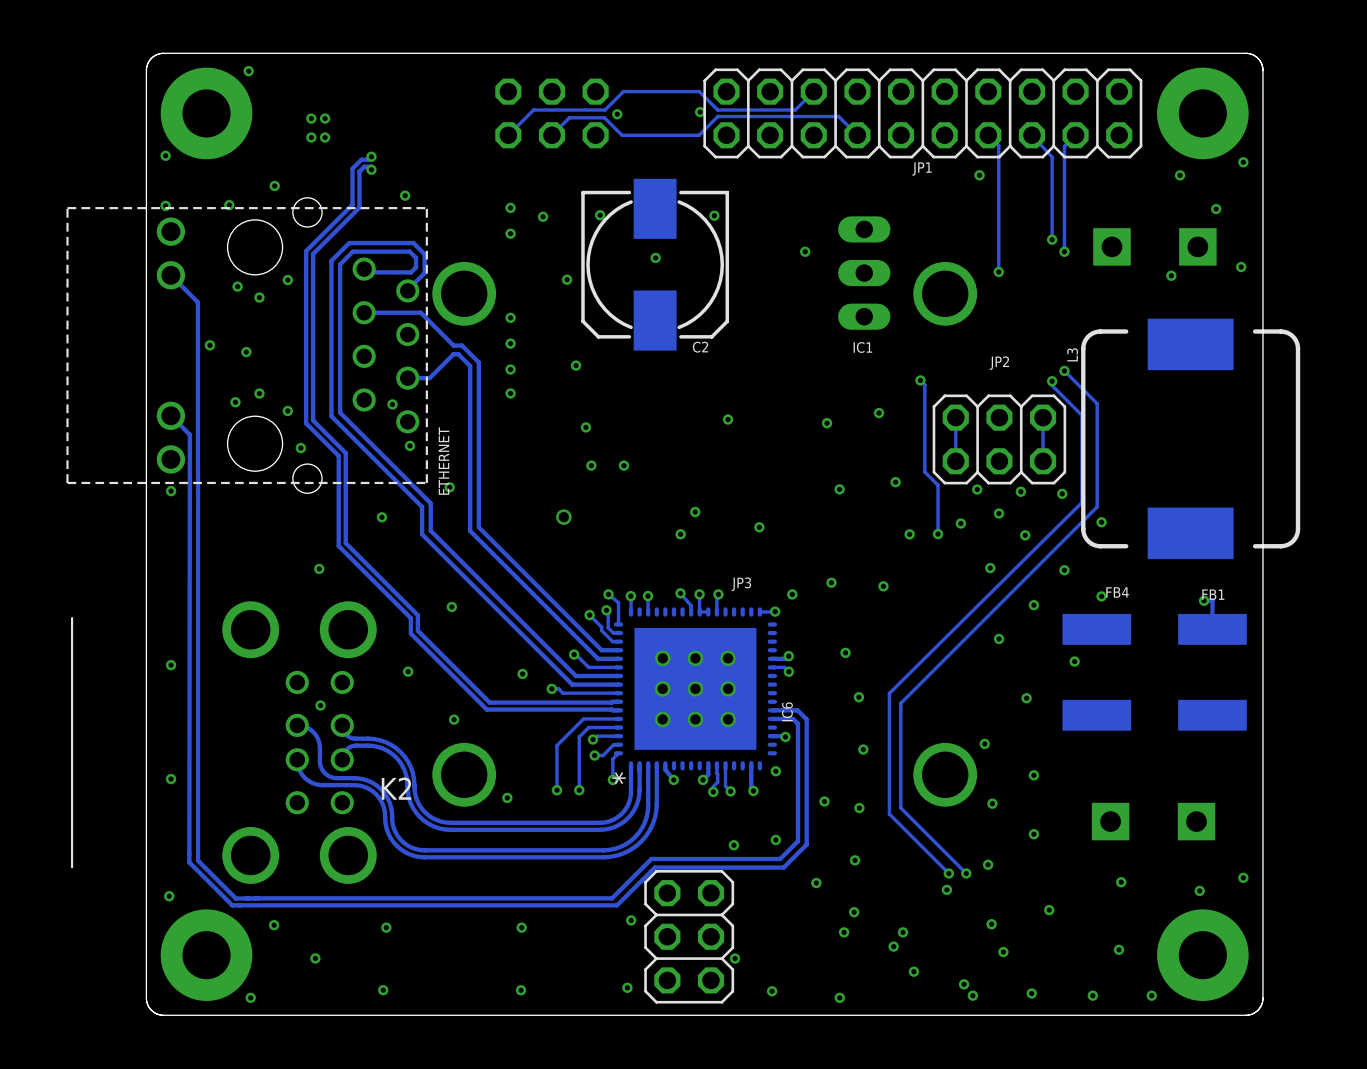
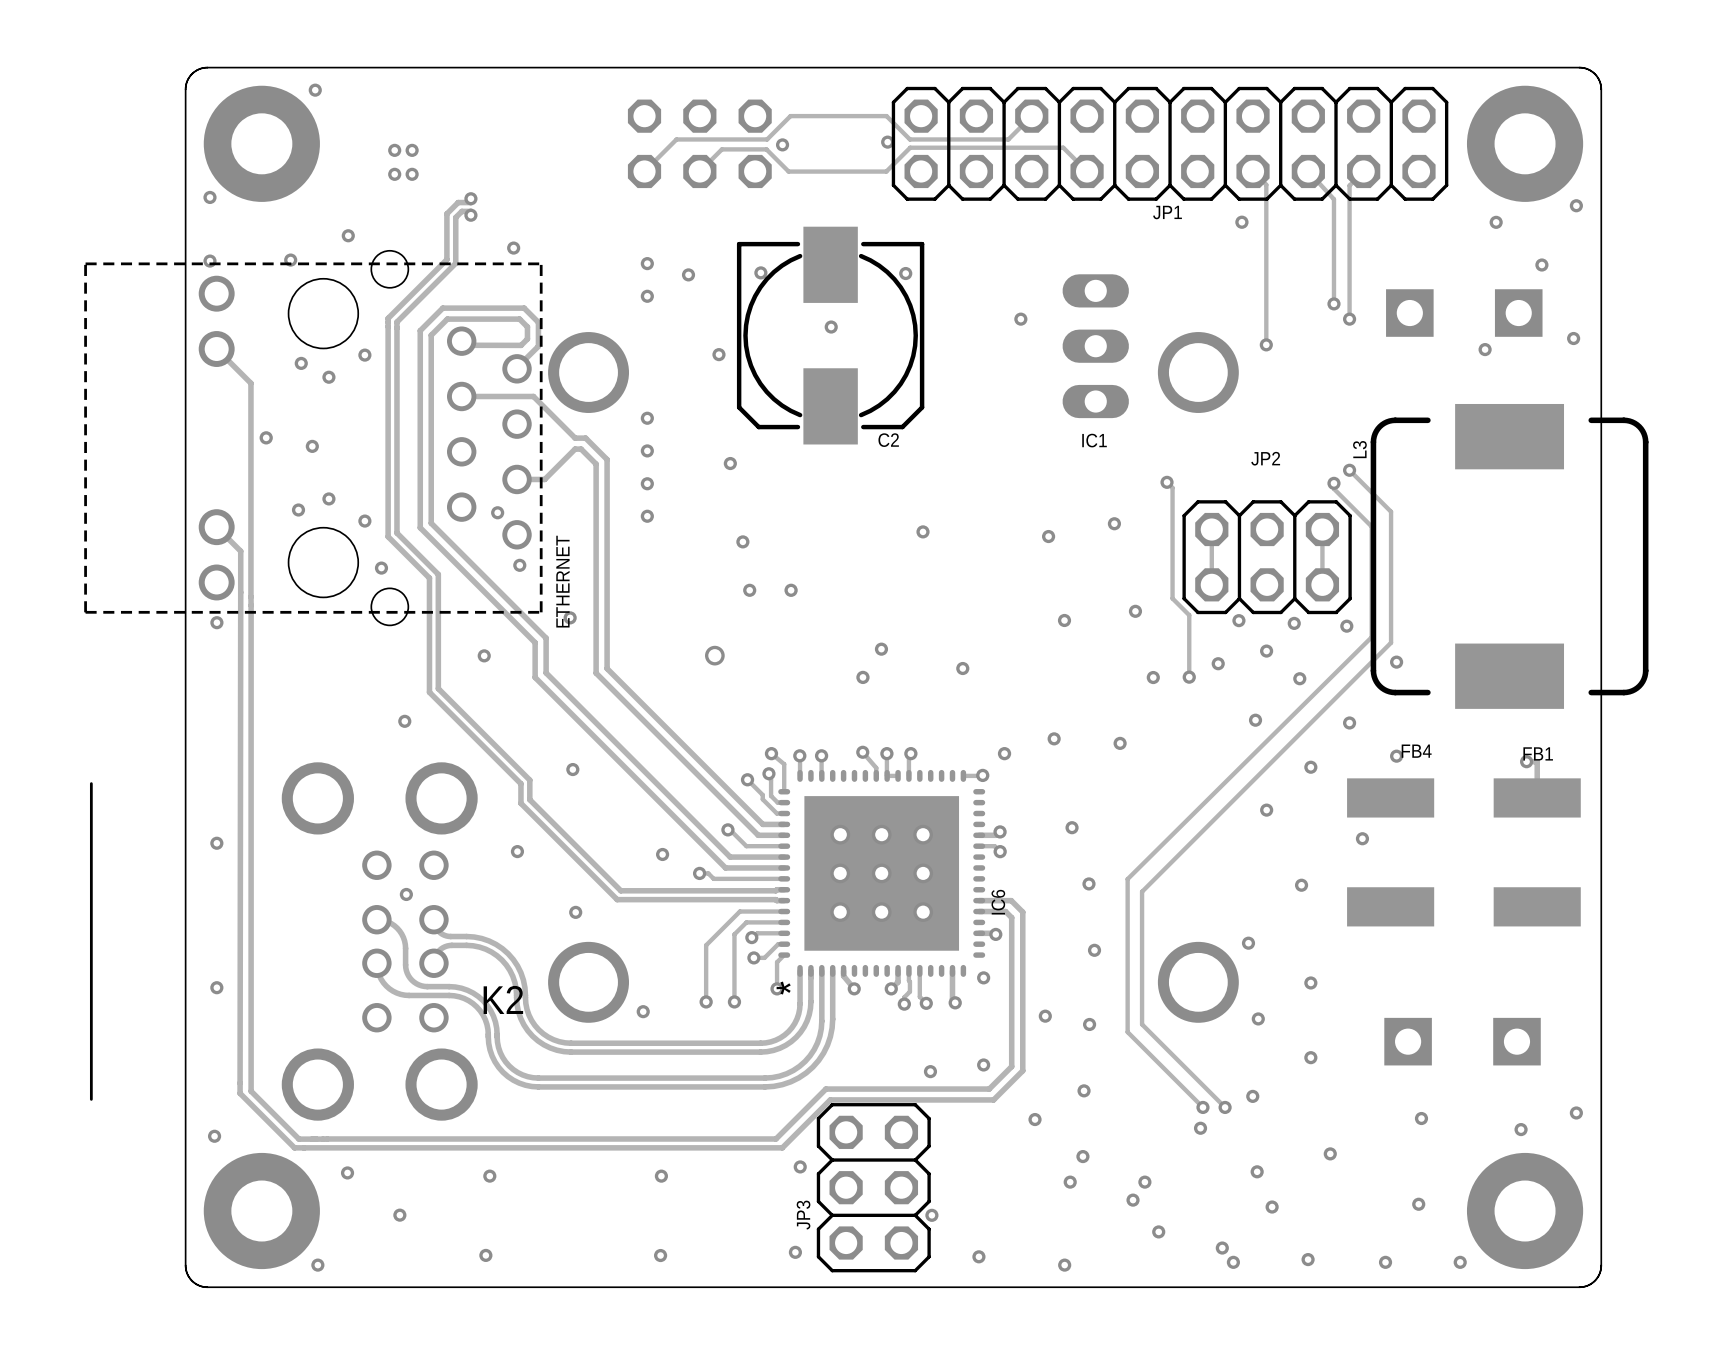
via: (510, 317) -> none
via: none -> (647, 418)
via: (510, 343) -> none
via: none -> (647, 450)
via: (510, 369) -> none
via: none -> (647, 483)
via: (510, 393) -> none
via: none -> (647, 516)
JP3 name rotation: 0° (741, 584) -> 90° counterclockwise (803, 1215)
JP3 name position: JP3 (741, 584) -> JP3 (803, 1215)

